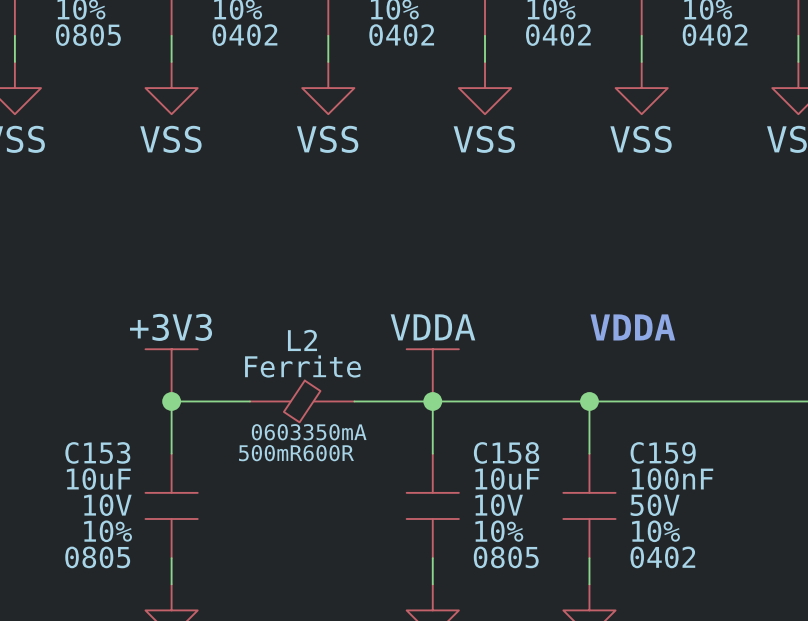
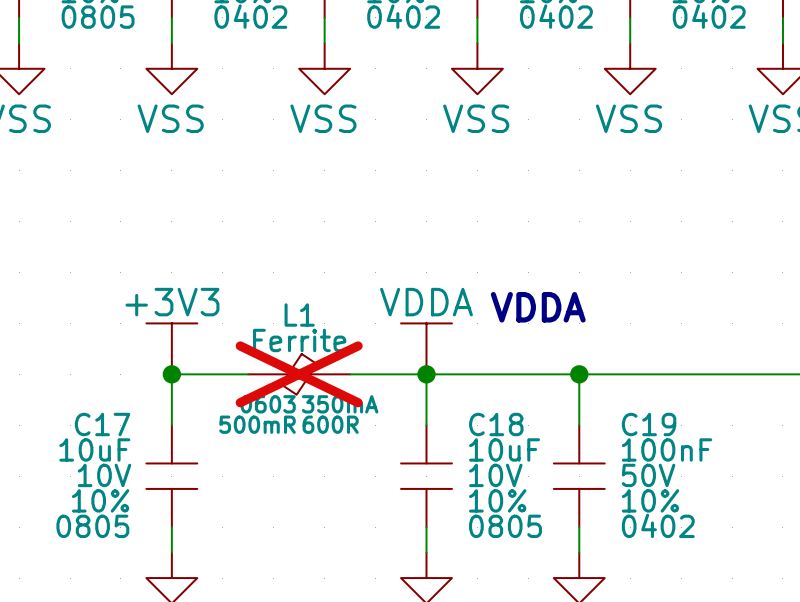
text position: VDDA (632, 327) -> VDDA (538, 307)
L2 name: L2 (302, 340) -> L1 (299, 315)
L2 do-not-place cross: none -> (299, 374)
C153 name: C153 (97, 452) -> C17 (102, 424)
C158 name: C158 (506, 452) -> C18 (496, 424)
C159 name: C159 (663, 452) -> C19 (649, 424)

